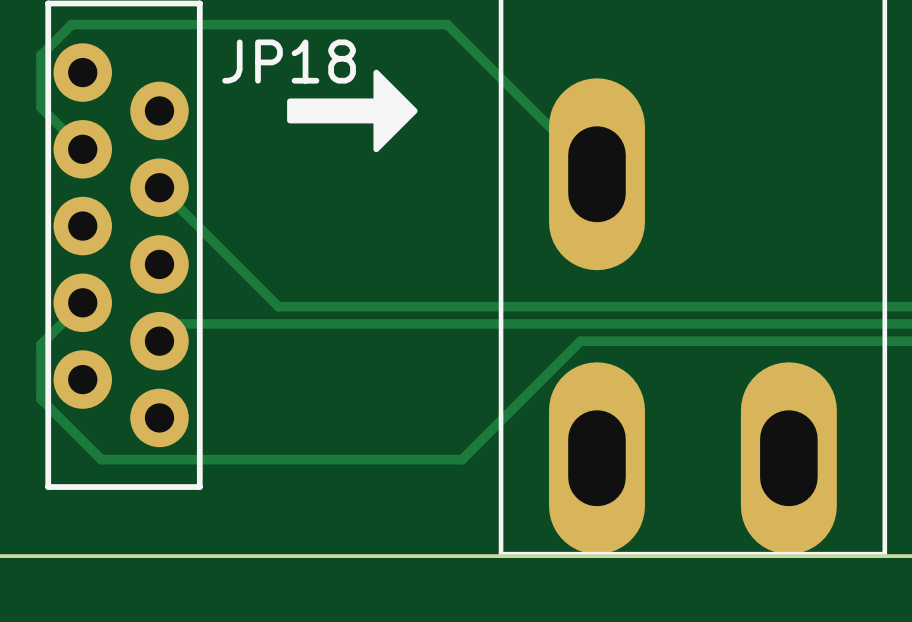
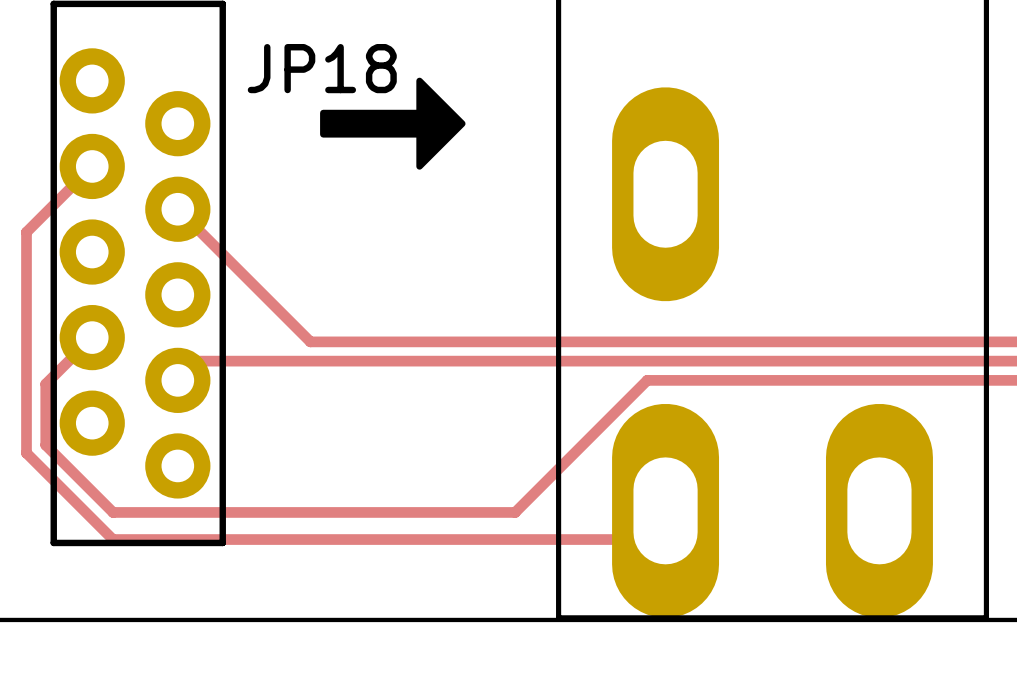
track: (82, 149) (41, 107) (41, 55) (71, 24) (447, 24) (596, 174) -> (92, 166) (26, 232) (26, 453) (112, 539) (636, 539) (665, 510)

